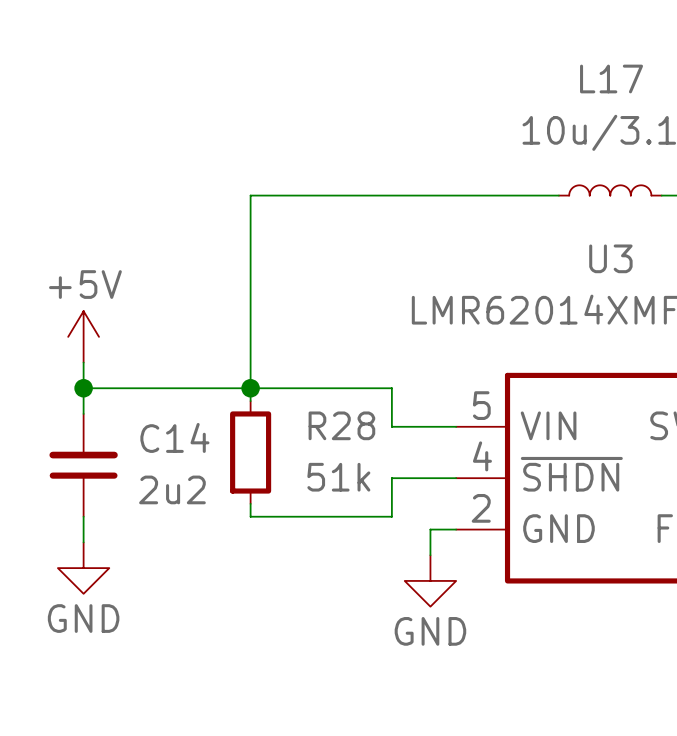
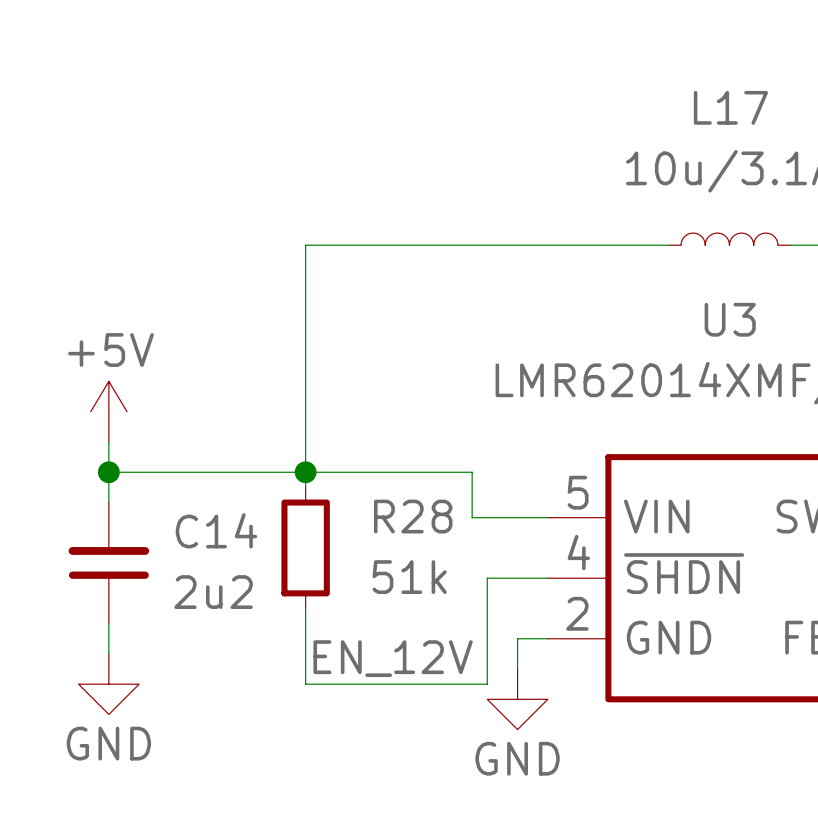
wire: (404, 478) (391, 478) (391, 516) (250, 516) -> (487, 578) (487, 684) (305, 684) (305, 623)
label: none -> EN_12V (393, 658)

